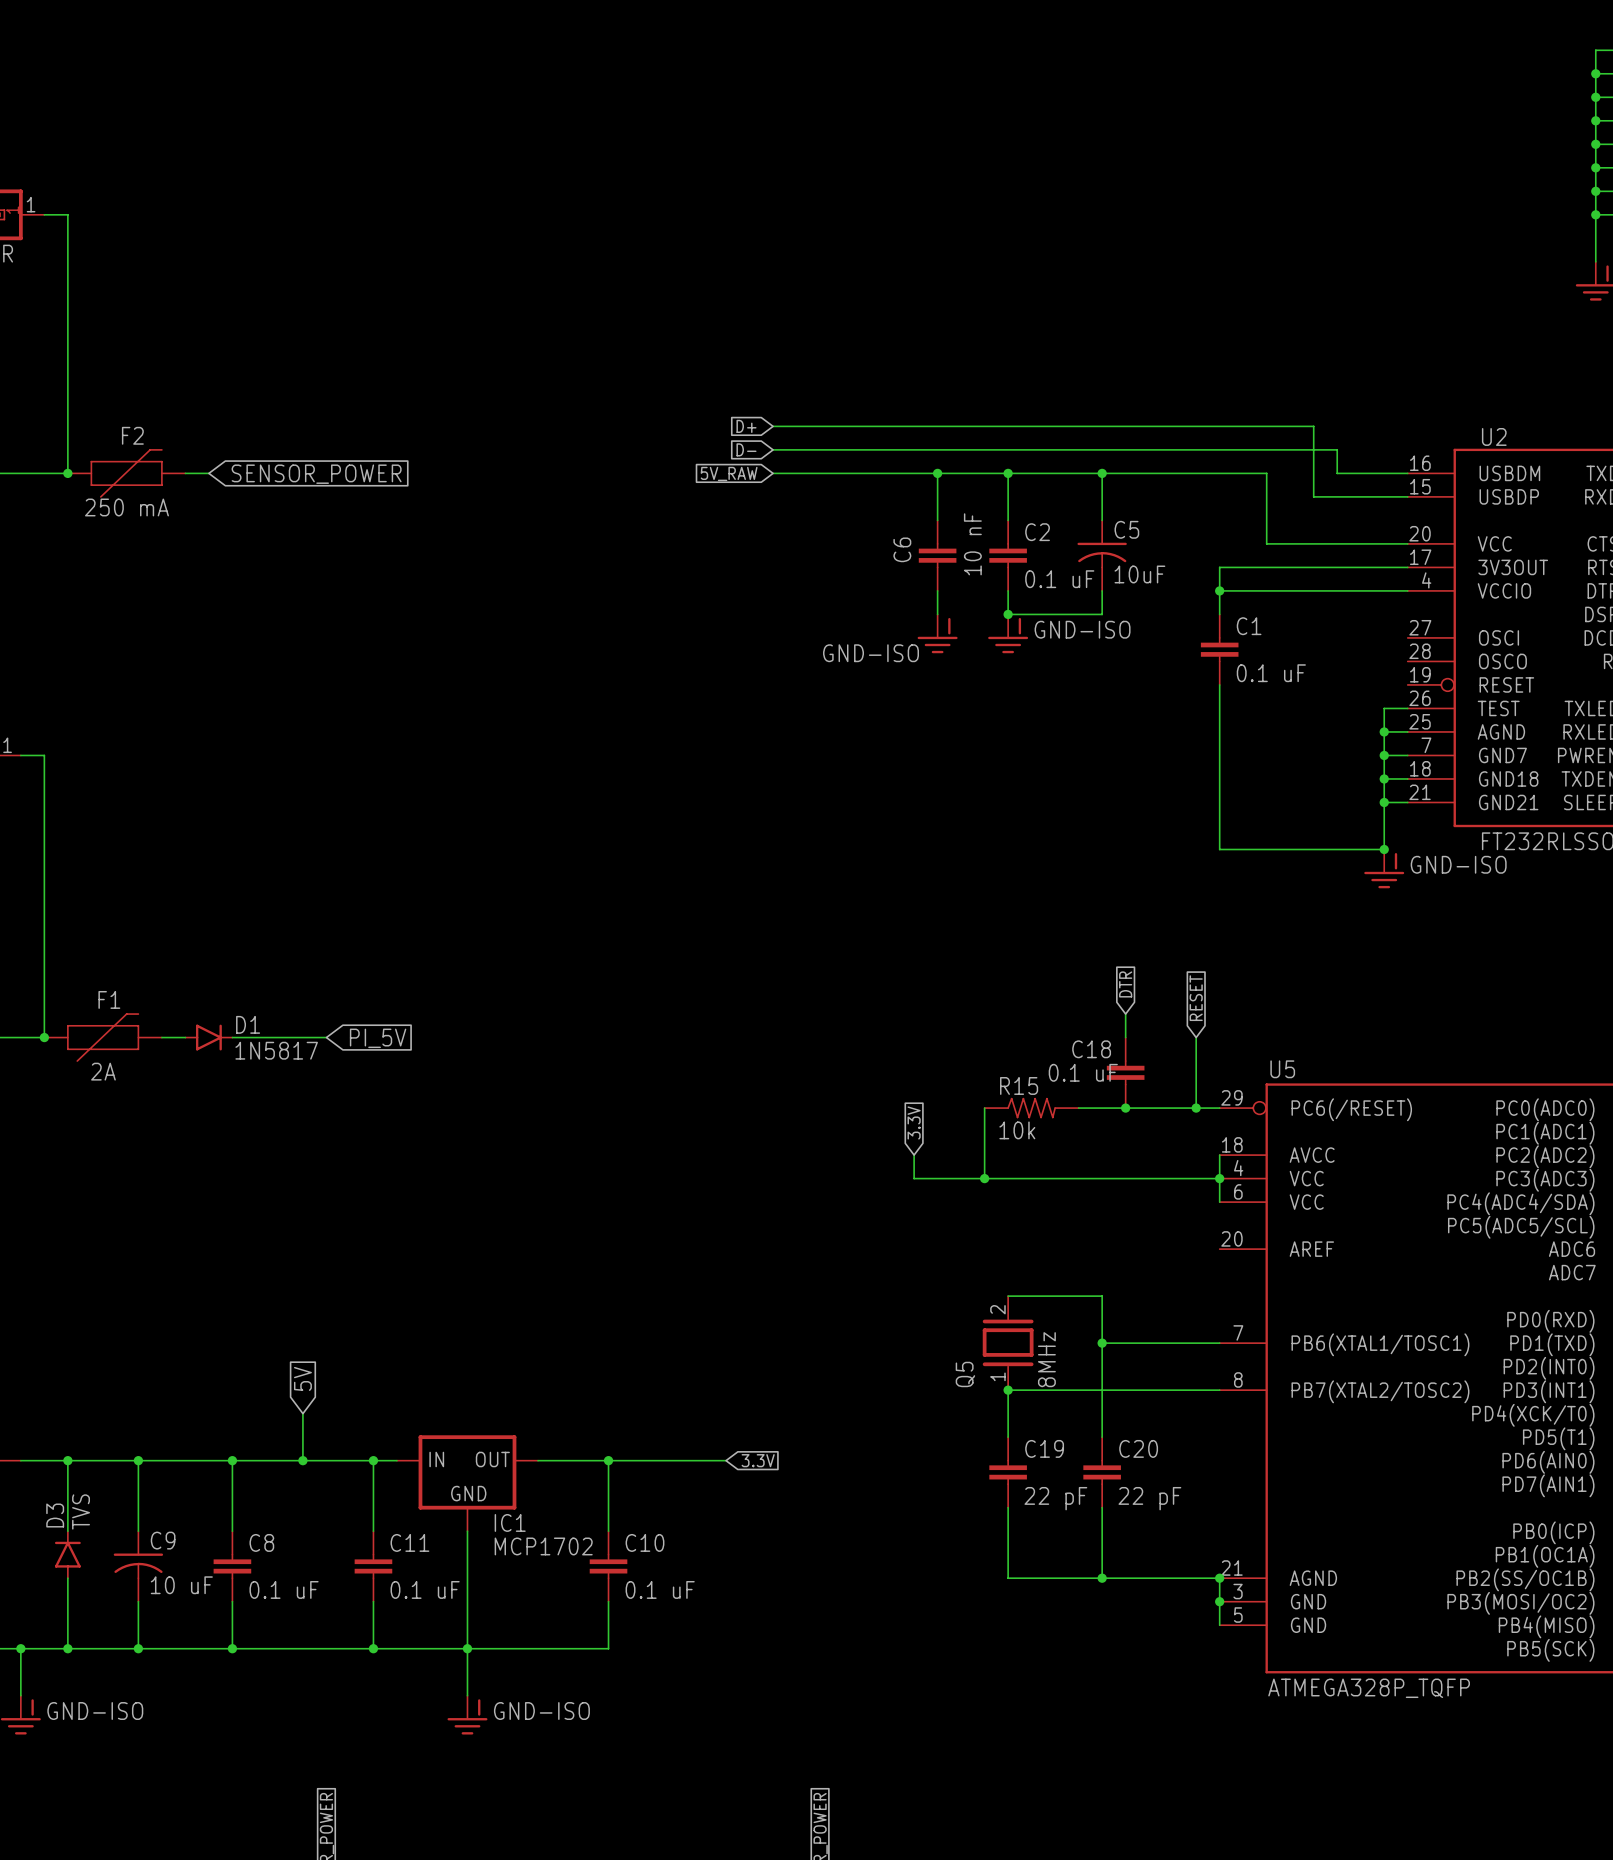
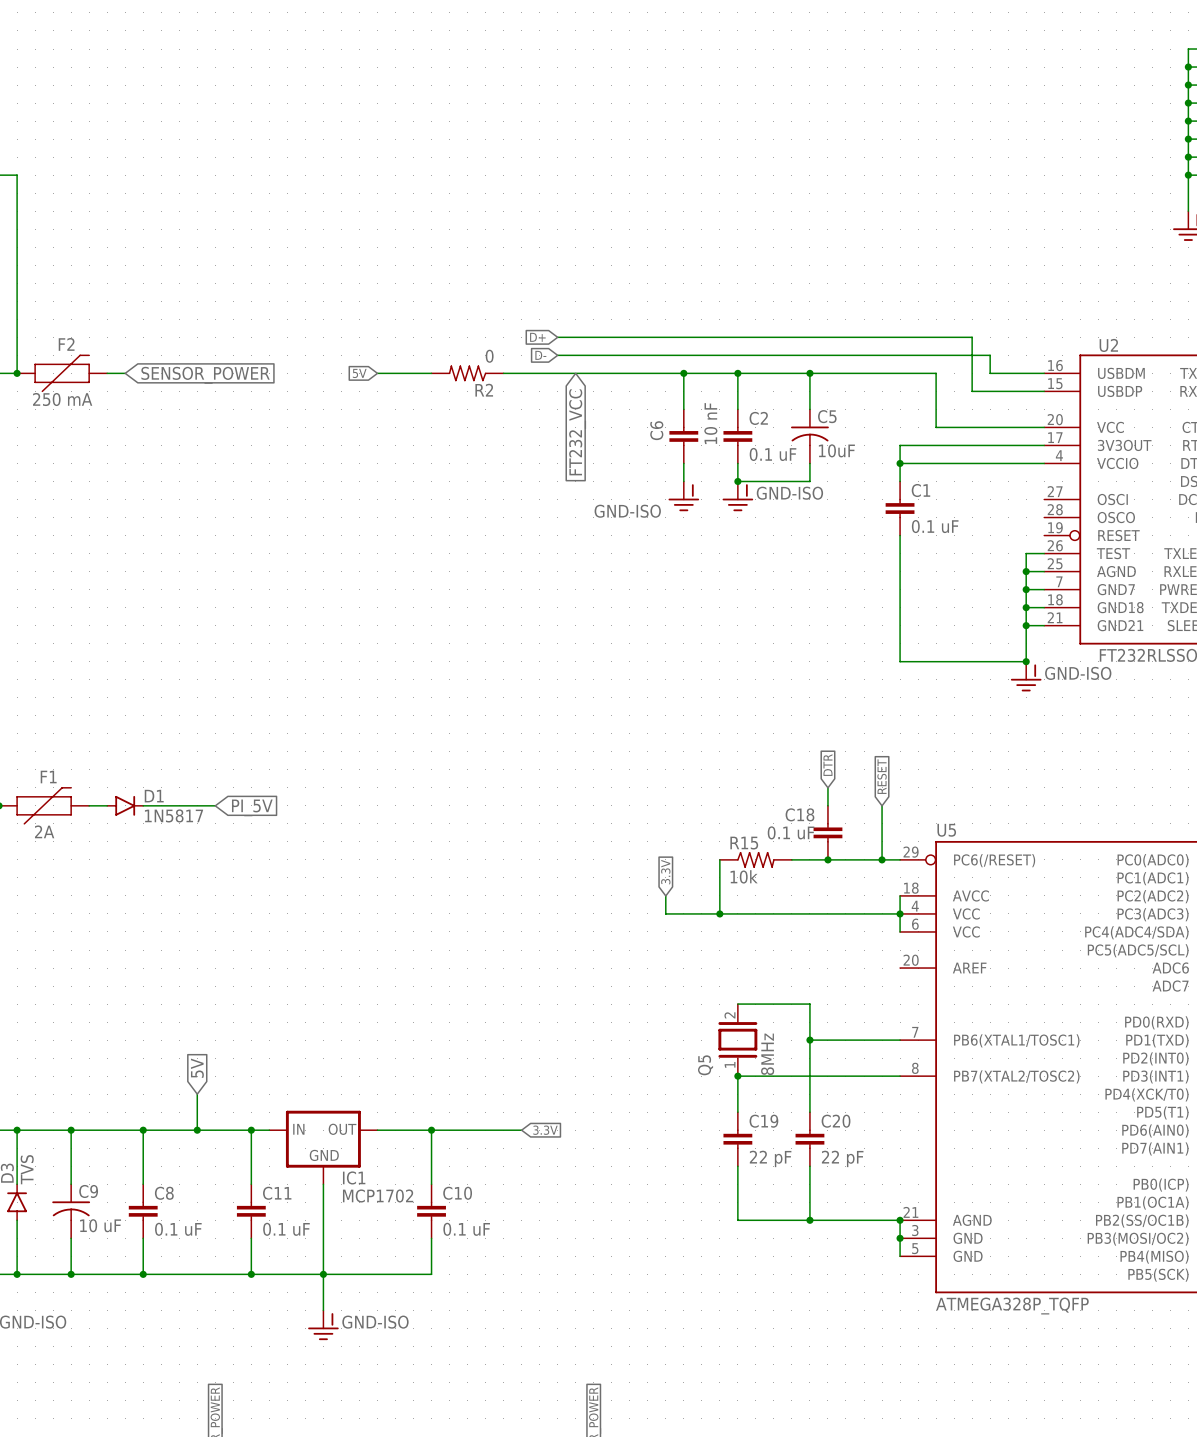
global label: none -> 5V (359, 373)
wire: none -> (377, 373) (431, 373)
R2: none -> 0 (467, 373)
wire: none -> (503, 373) (557, 373)
global label: 5V_RAW (729, 473) -> none
global label: none -> FT232_VCC (577, 432)

